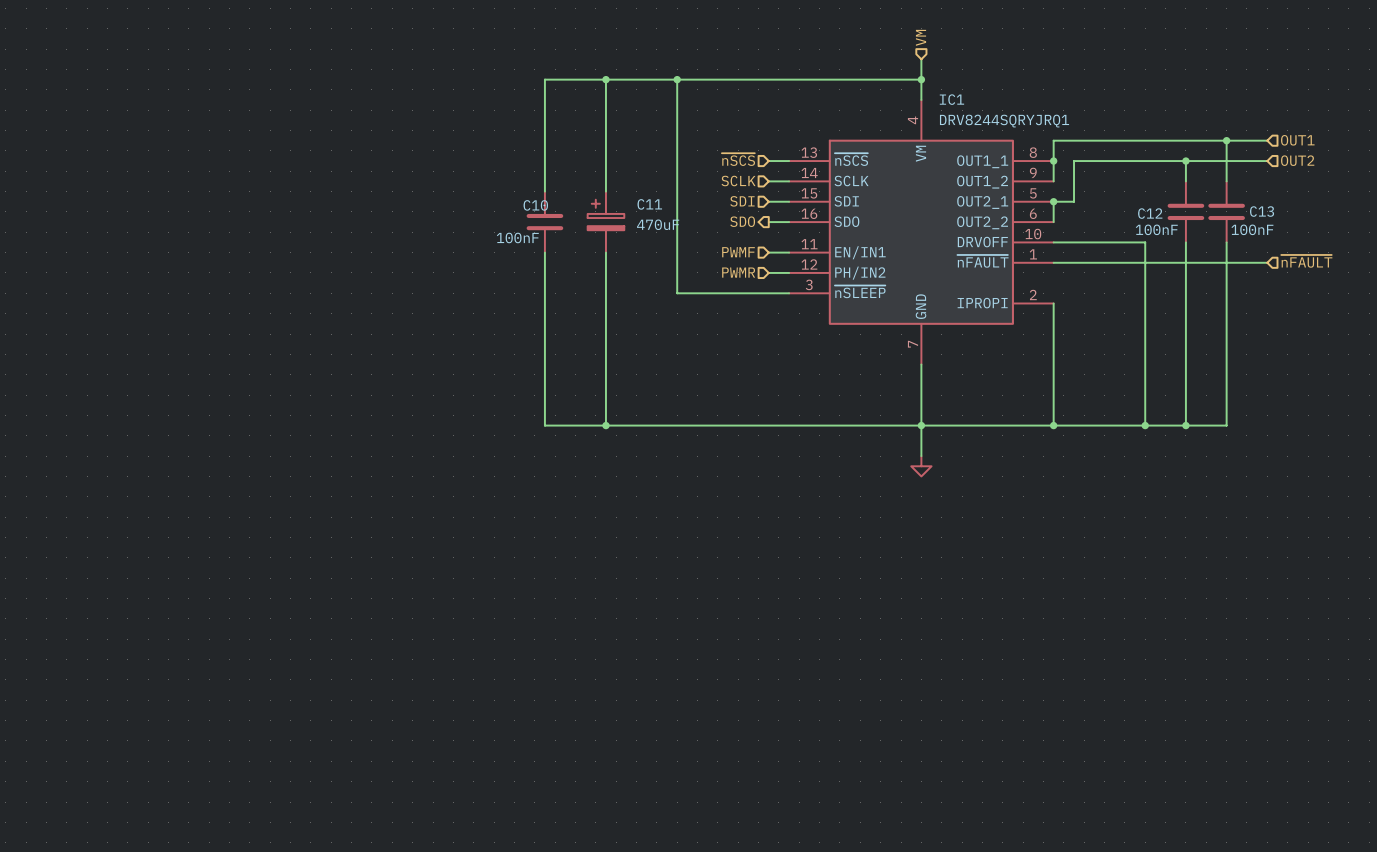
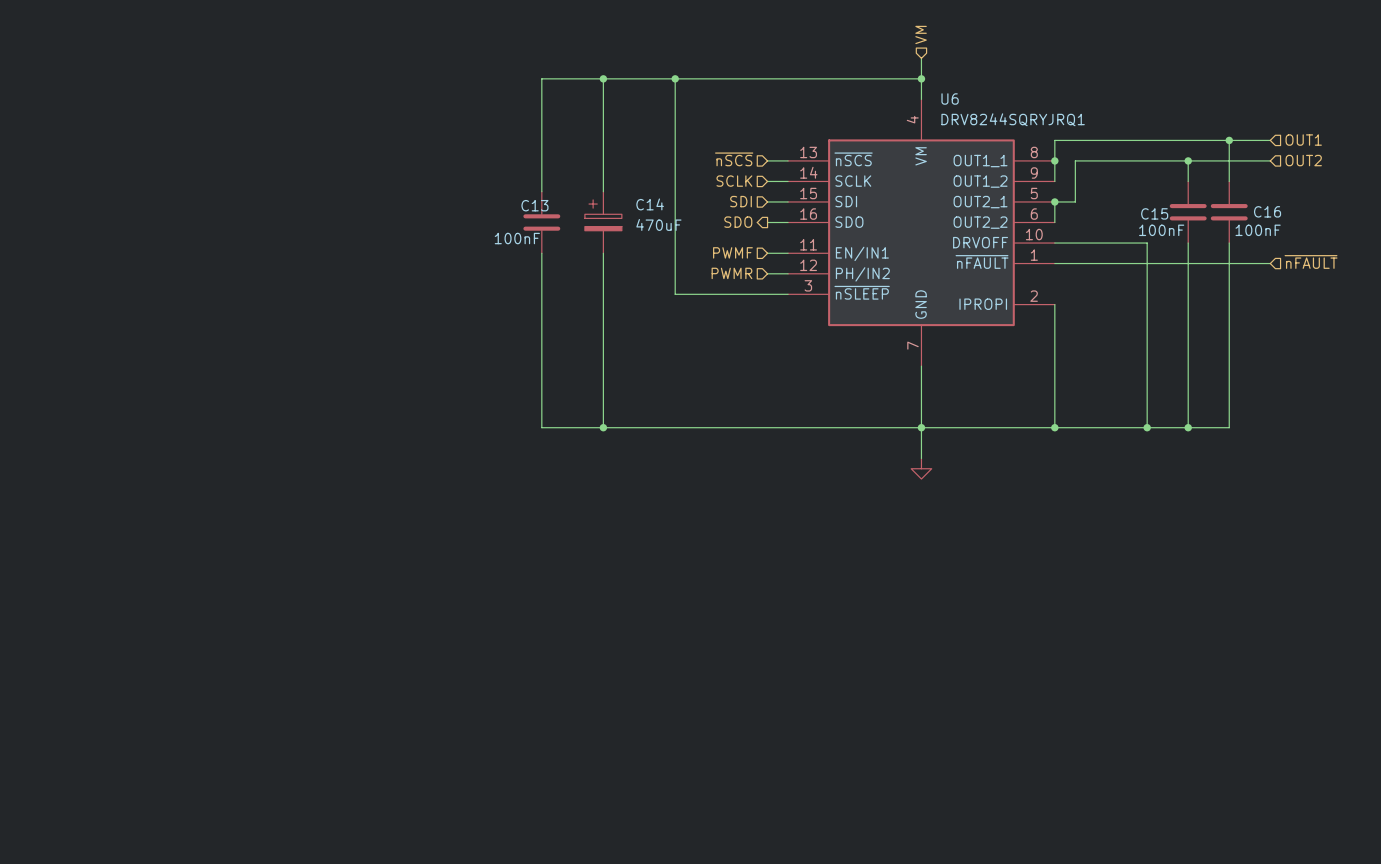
IC1 name: IC1 (951, 99) -> U6 (950, 98)
C11 name: C11 (649, 204) -> C14 (650, 204)
C10 name: C10 (535, 205) -> C13 (534, 205)
C13 name: C13 (1262, 211) -> C16 (1267, 211)
C12 name: C12 (1150, 213) -> C15 (1154, 213)

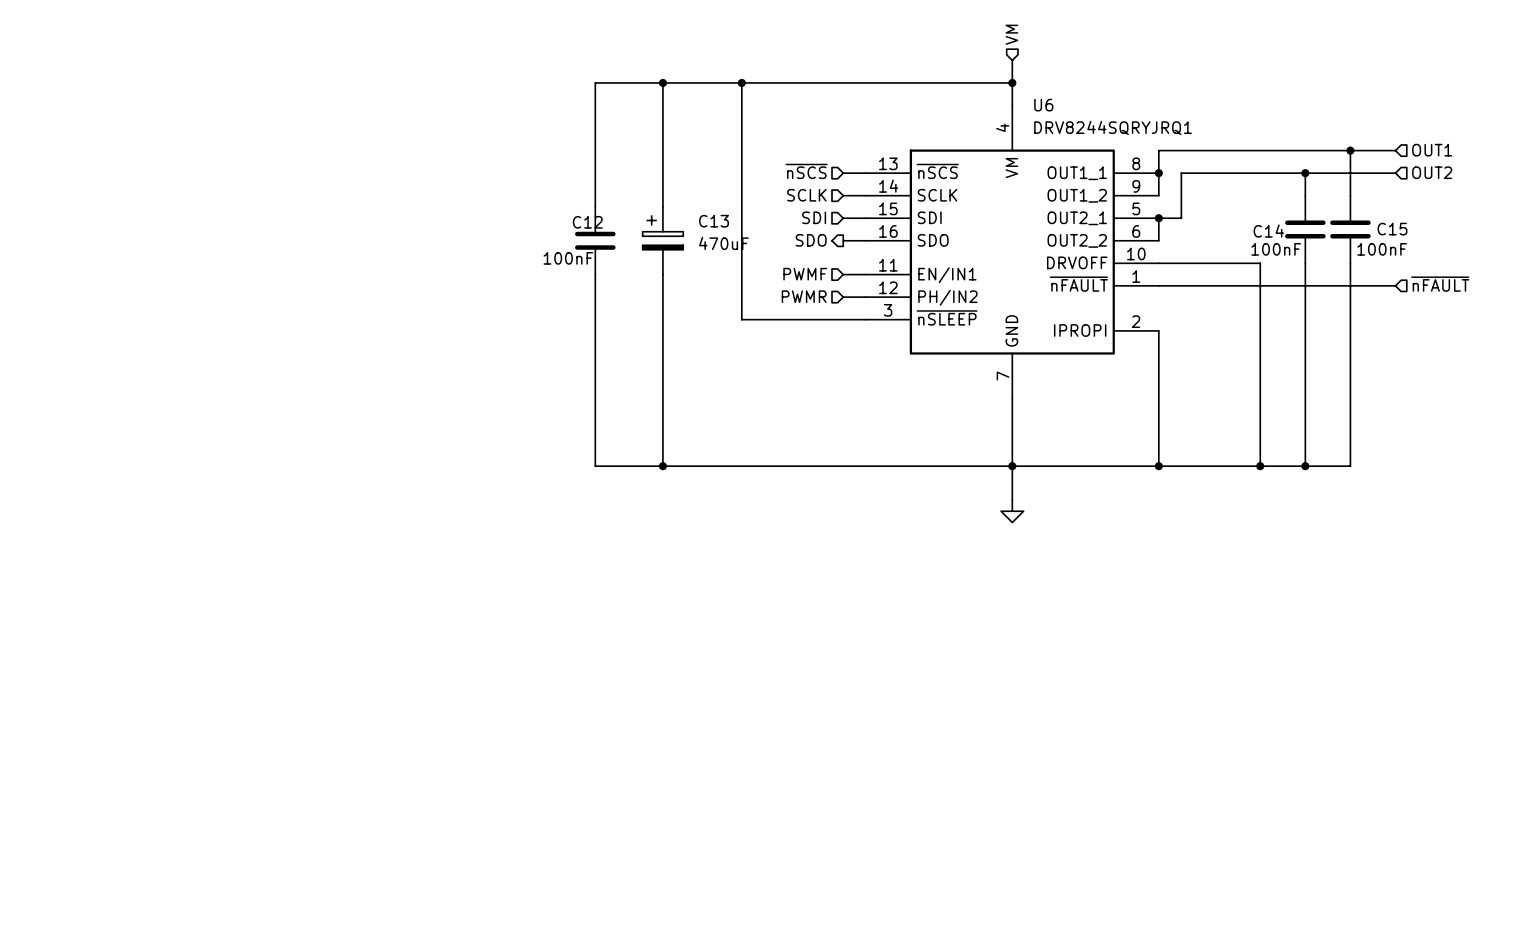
C14 name: C14 (650, 204) -> C13 (714, 221)
C13 name: C13 (534, 205) -> C12 (587, 222)
C16 name: C16 (1267, 211) -> C15 (1392, 229)
C15 name: C15 (1154, 213) -> C14 (1268, 231)

